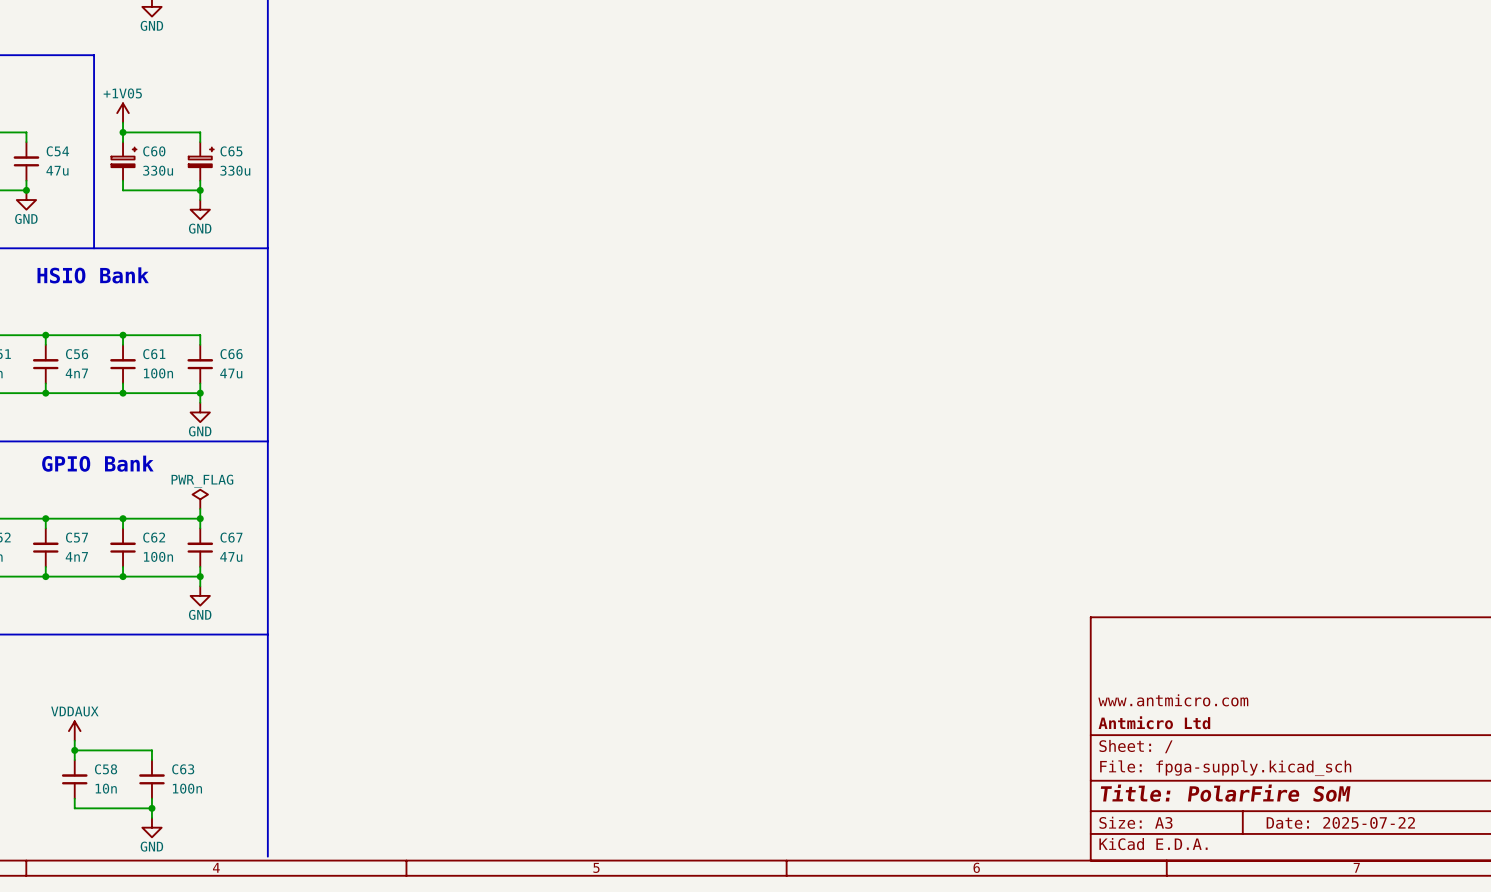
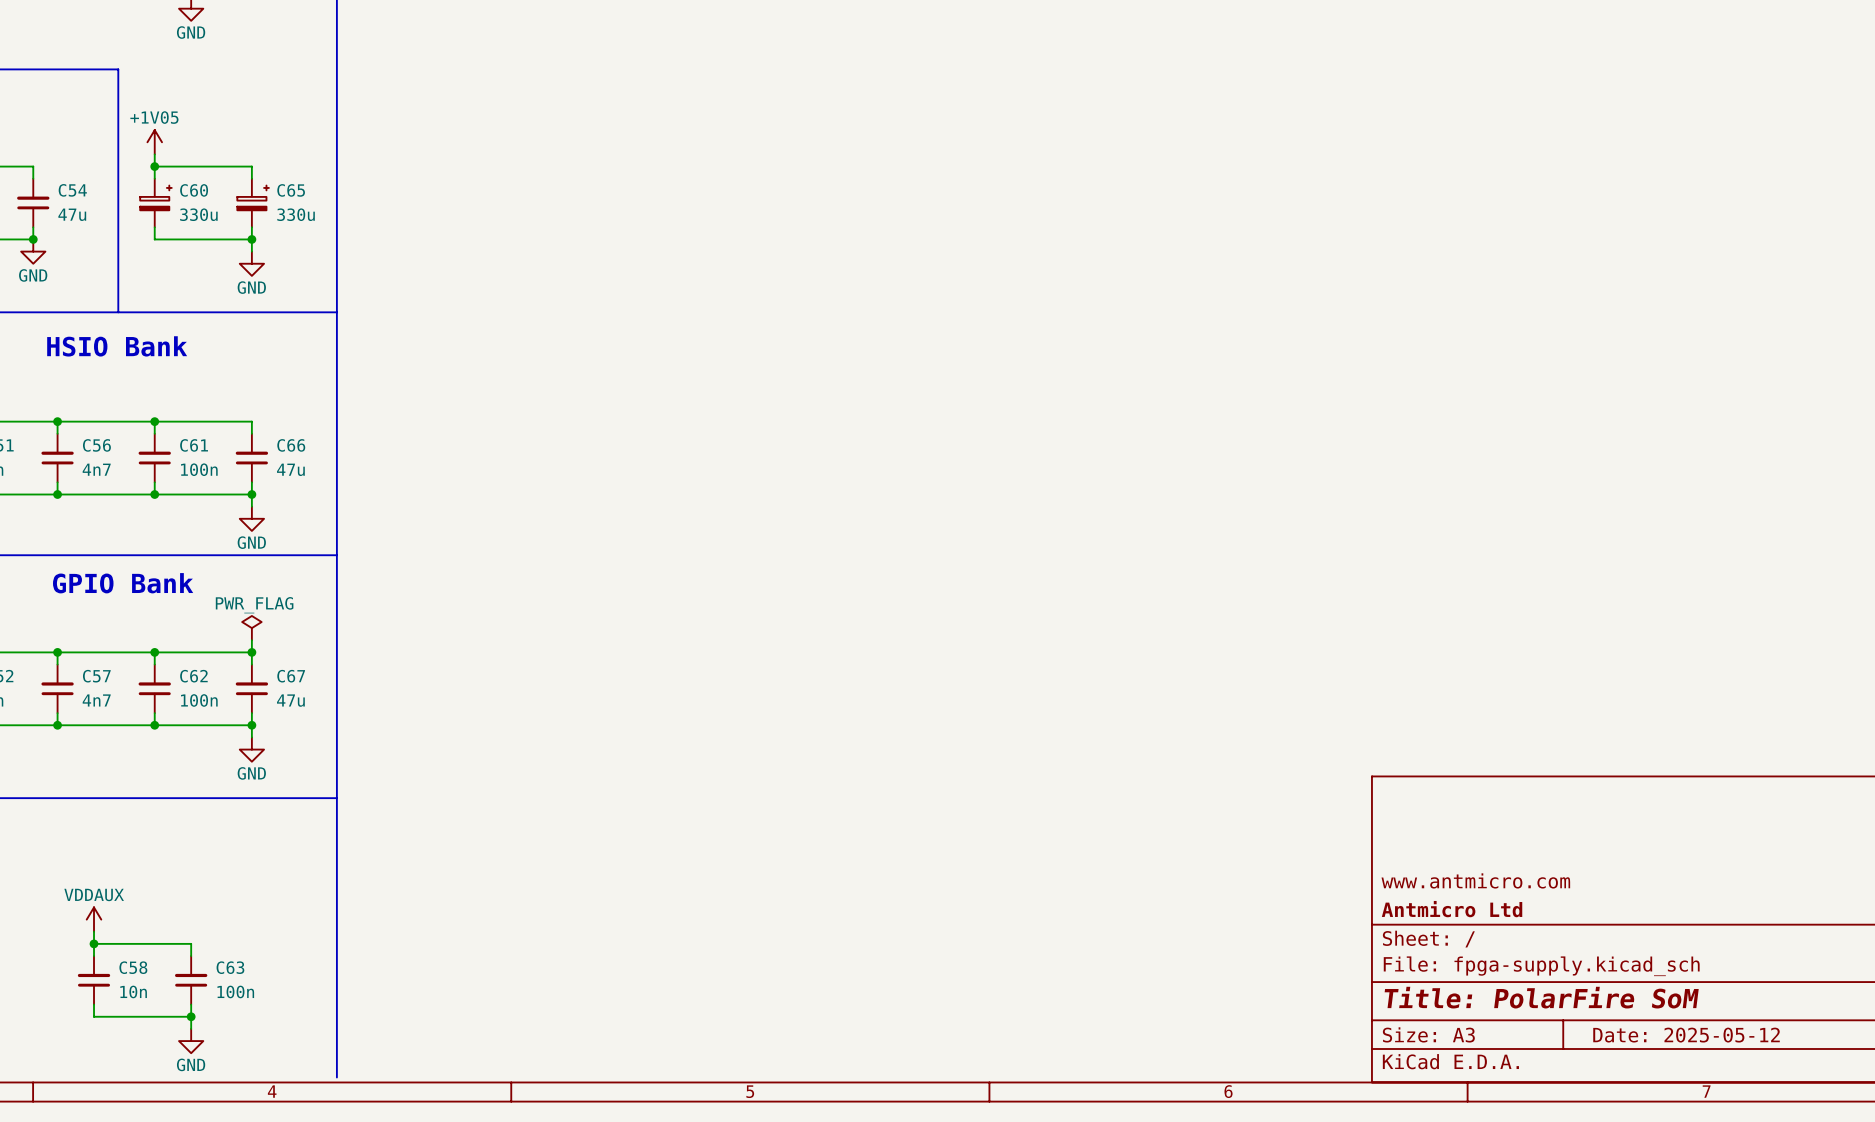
title block: Date: 2025-07-22 (1340, 822) -> Date: 2025-05-12 (1686, 1035)

